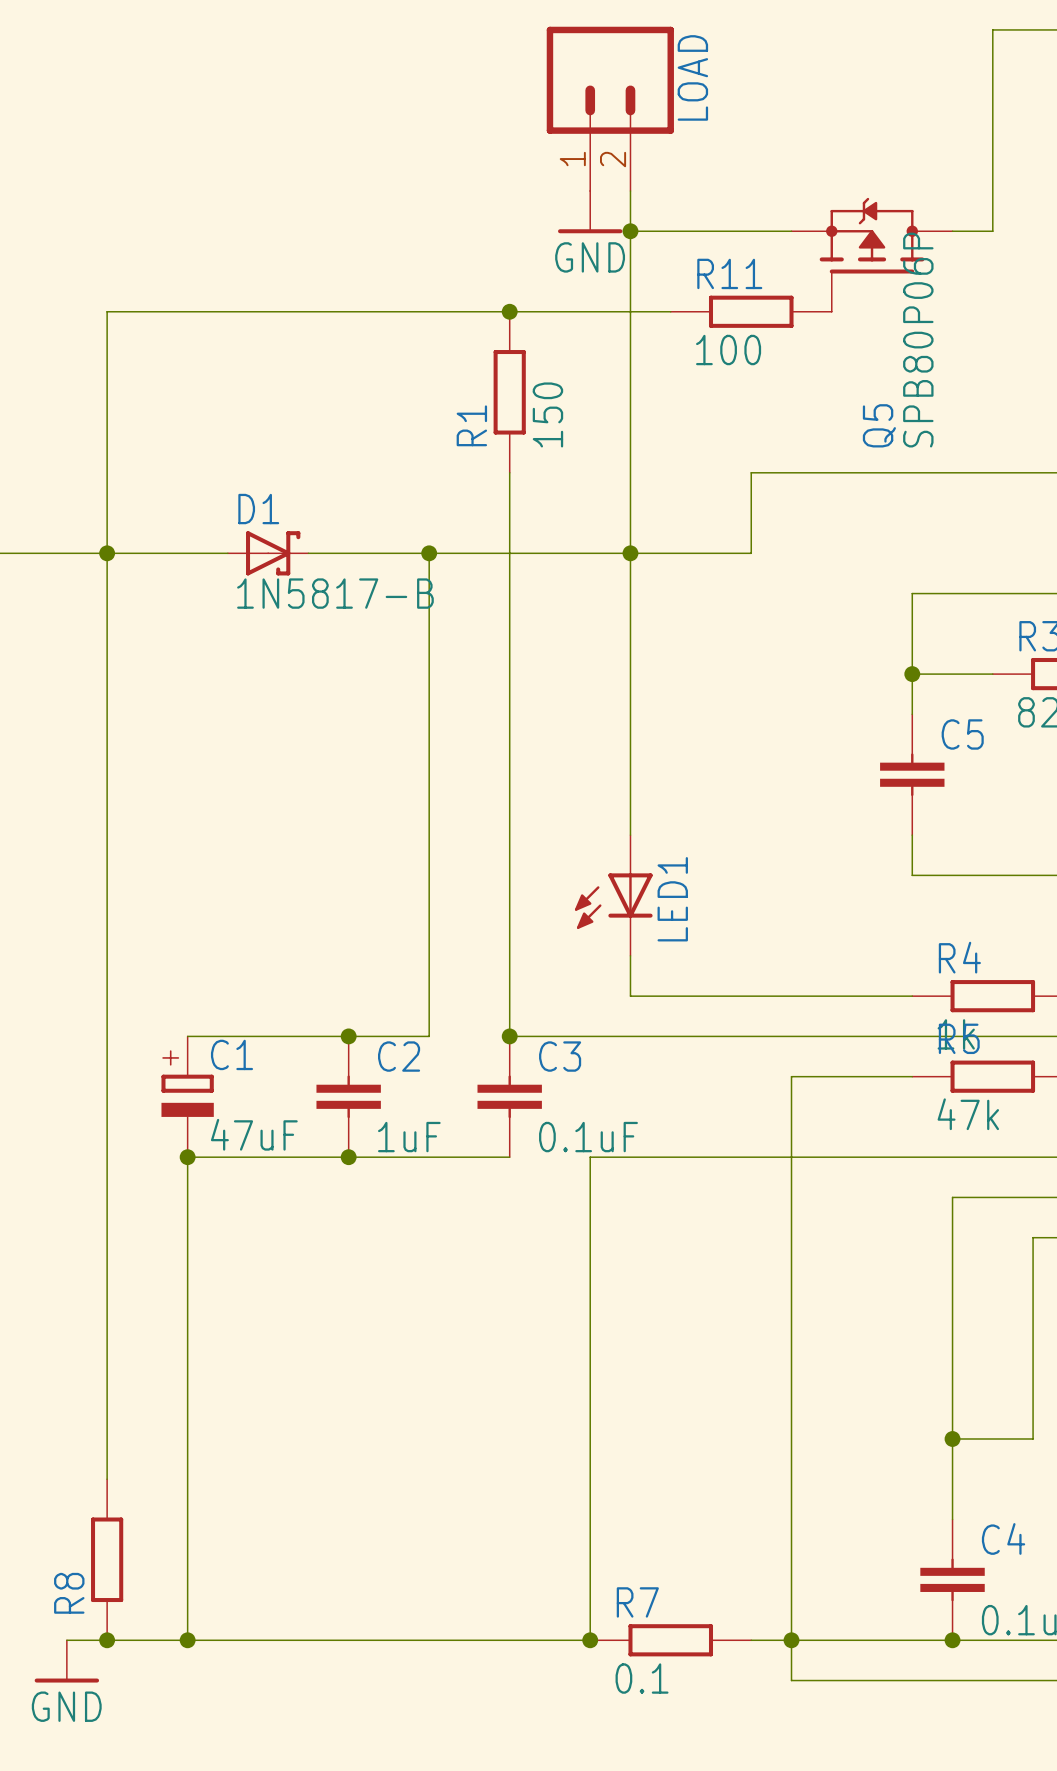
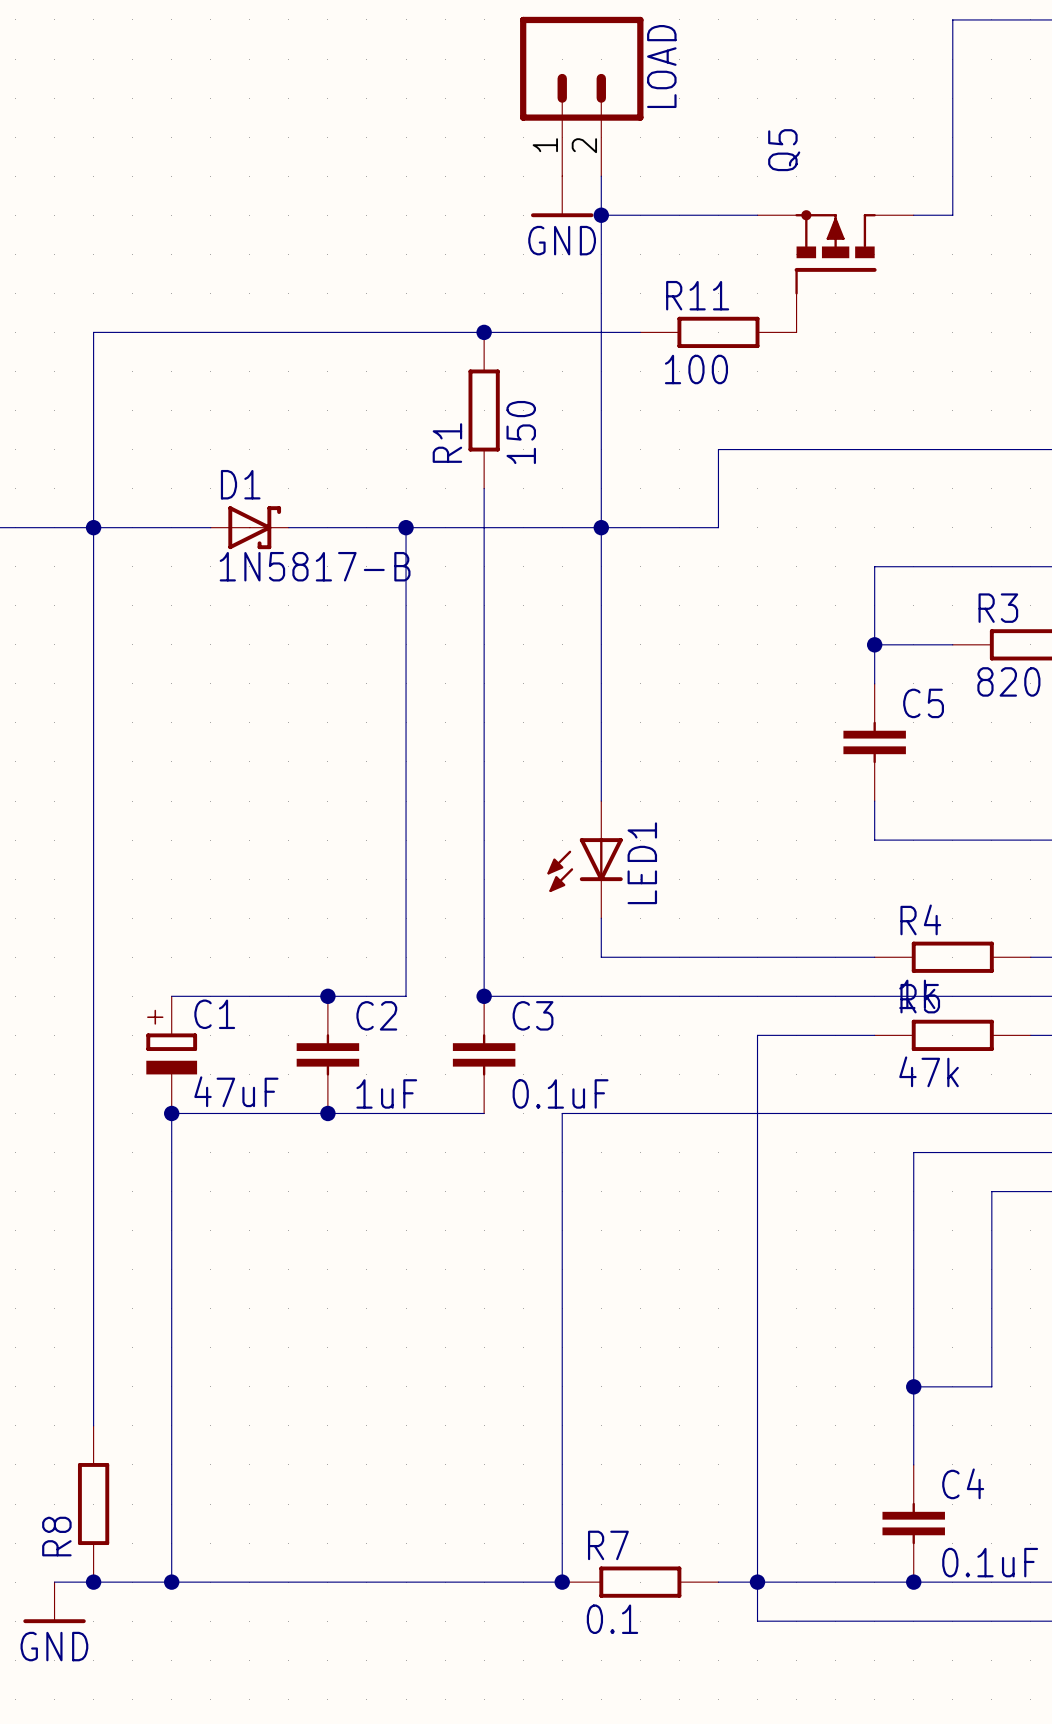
Q5 symbol: [791, 197, 953, 312] -> [757, 210, 914, 333]
junction position: (509, 311) -> (484, 332)
wire: (670, 311) (107, 311) (107, 352) -> (640, 332) (93, 332)
R11 position: (751, 311) -> (718, 332)
Q5 value: SPB80P06P (918, 340) -> none
R1 position: (509, 392) -> (484, 410)
Q5 name position: Q5 (879, 425) -> Q5 (784, 150)

